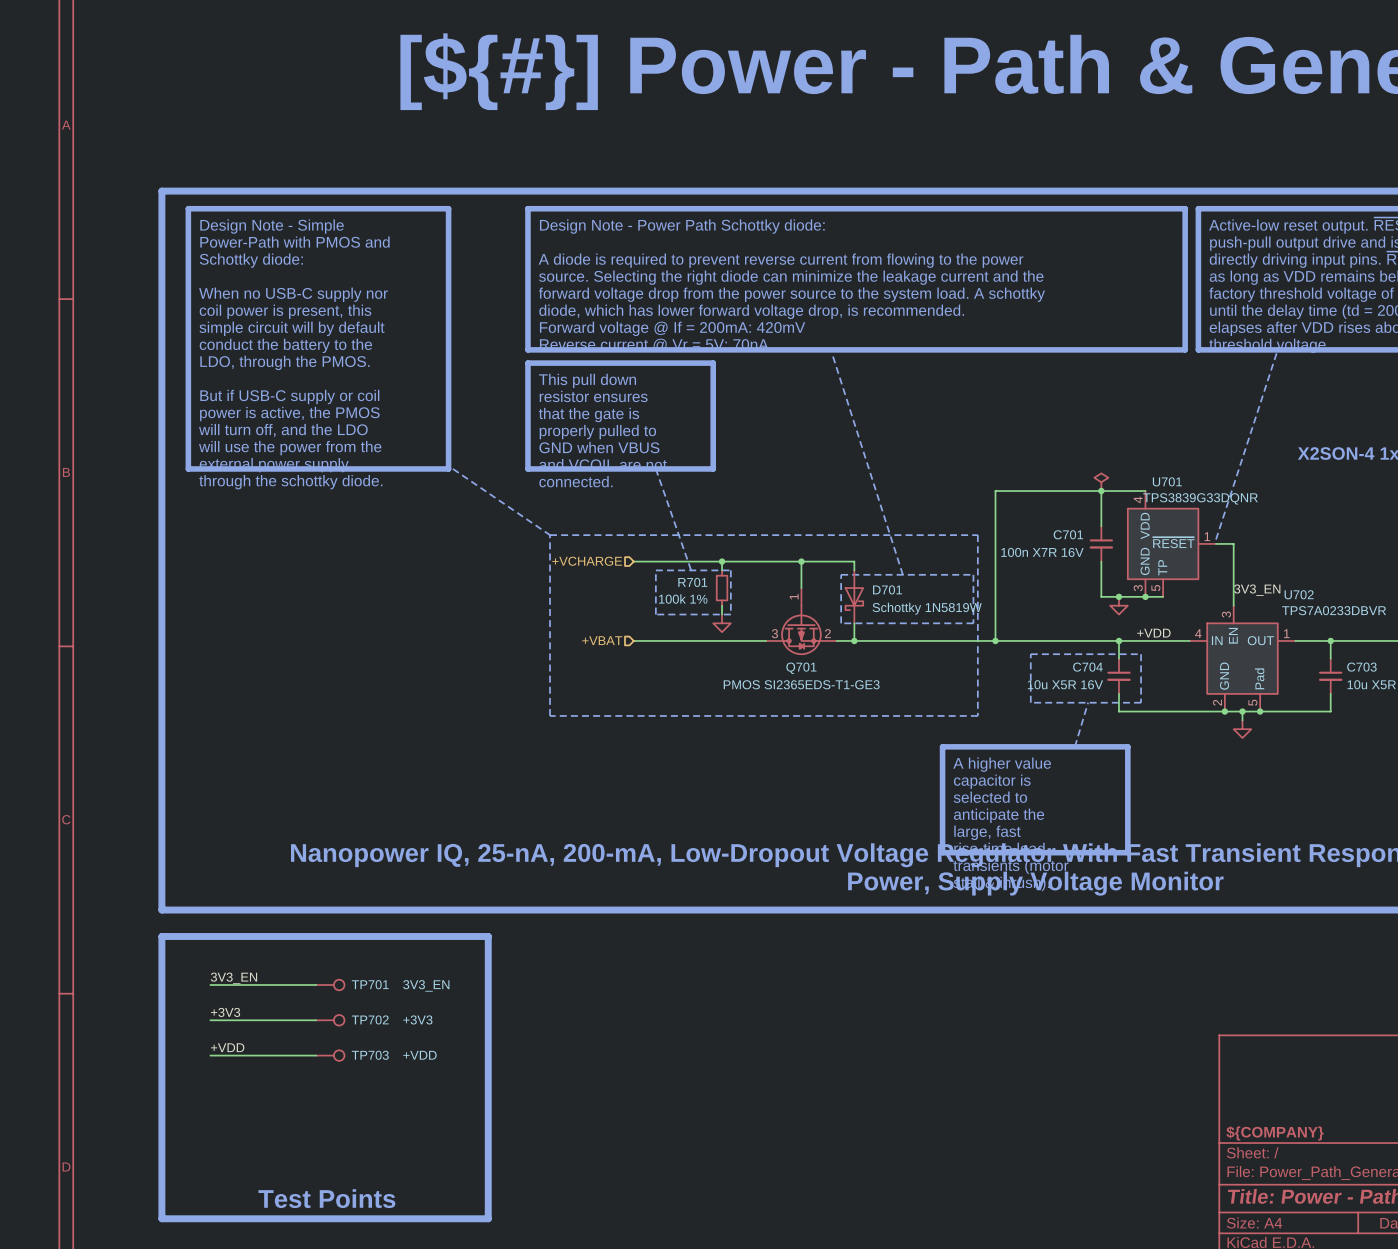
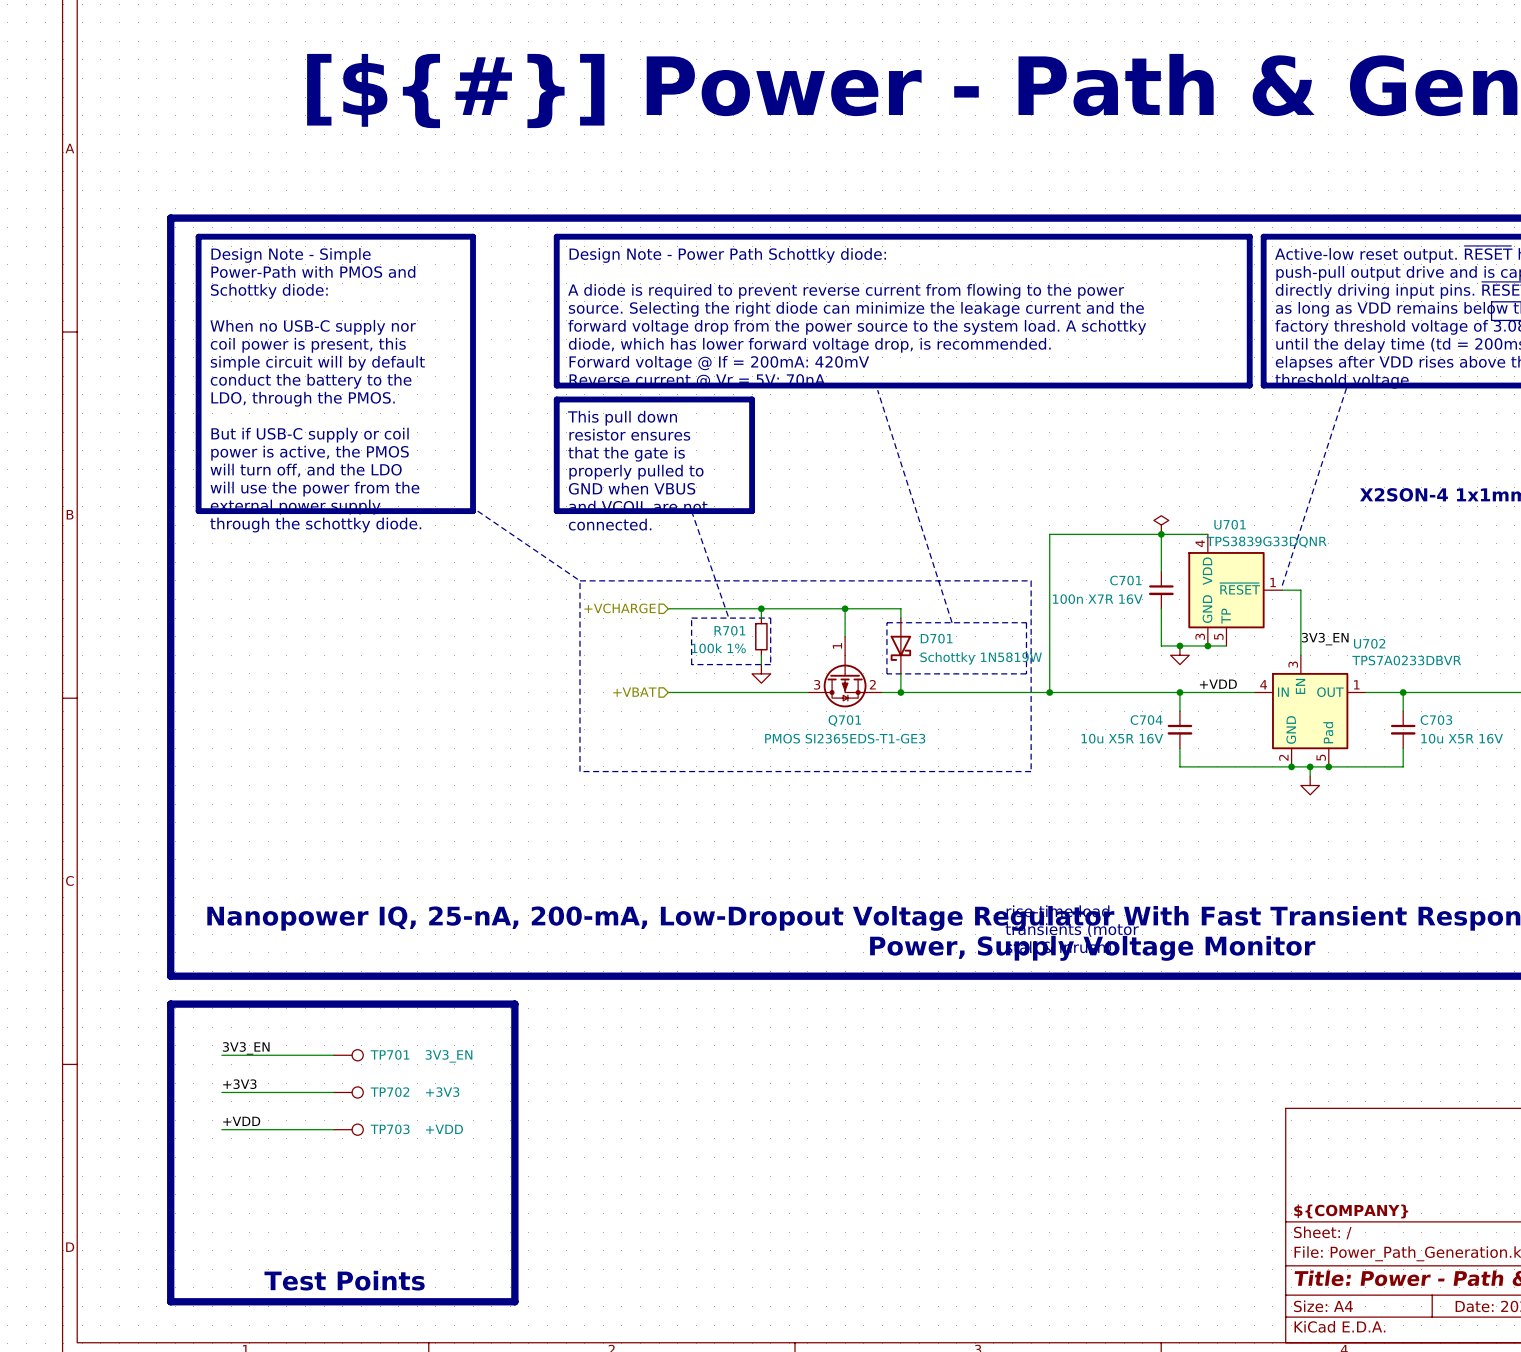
line: (1030, 654) (1141, 654) (1141, 702) (1030, 702) (1030, 654) -> none
line: (1088, 702) (1074, 746) -> none
line: (942, 746) (1127, 746) (1127, 852) (942, 852) (942, 746) -> none
text: A higher value (1002, 764) -> none
text: capacitor is (992, 781) -> none
text: selected to (990, 797) -> none
text: anticipate the (999, 815) -> none
text: large, fast (987, 832) -> none

